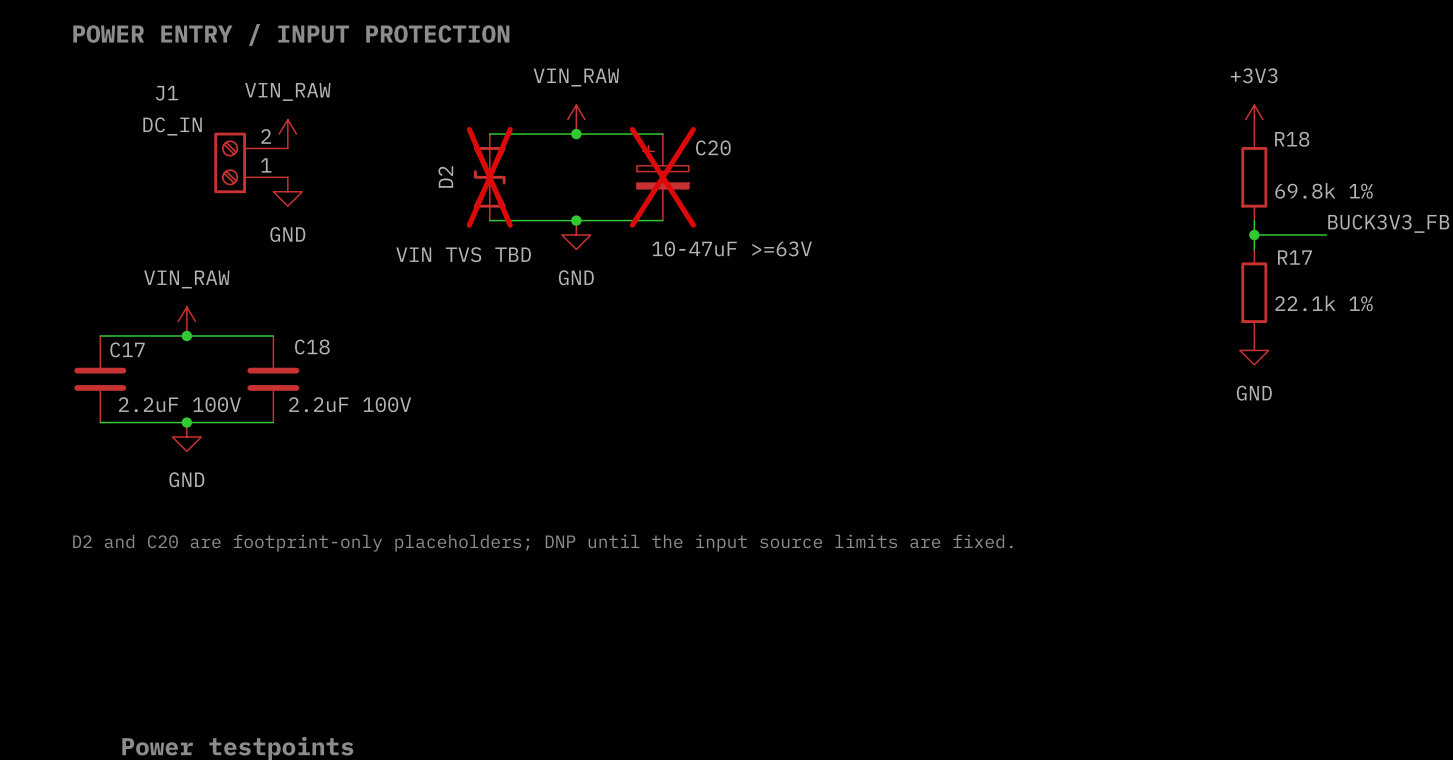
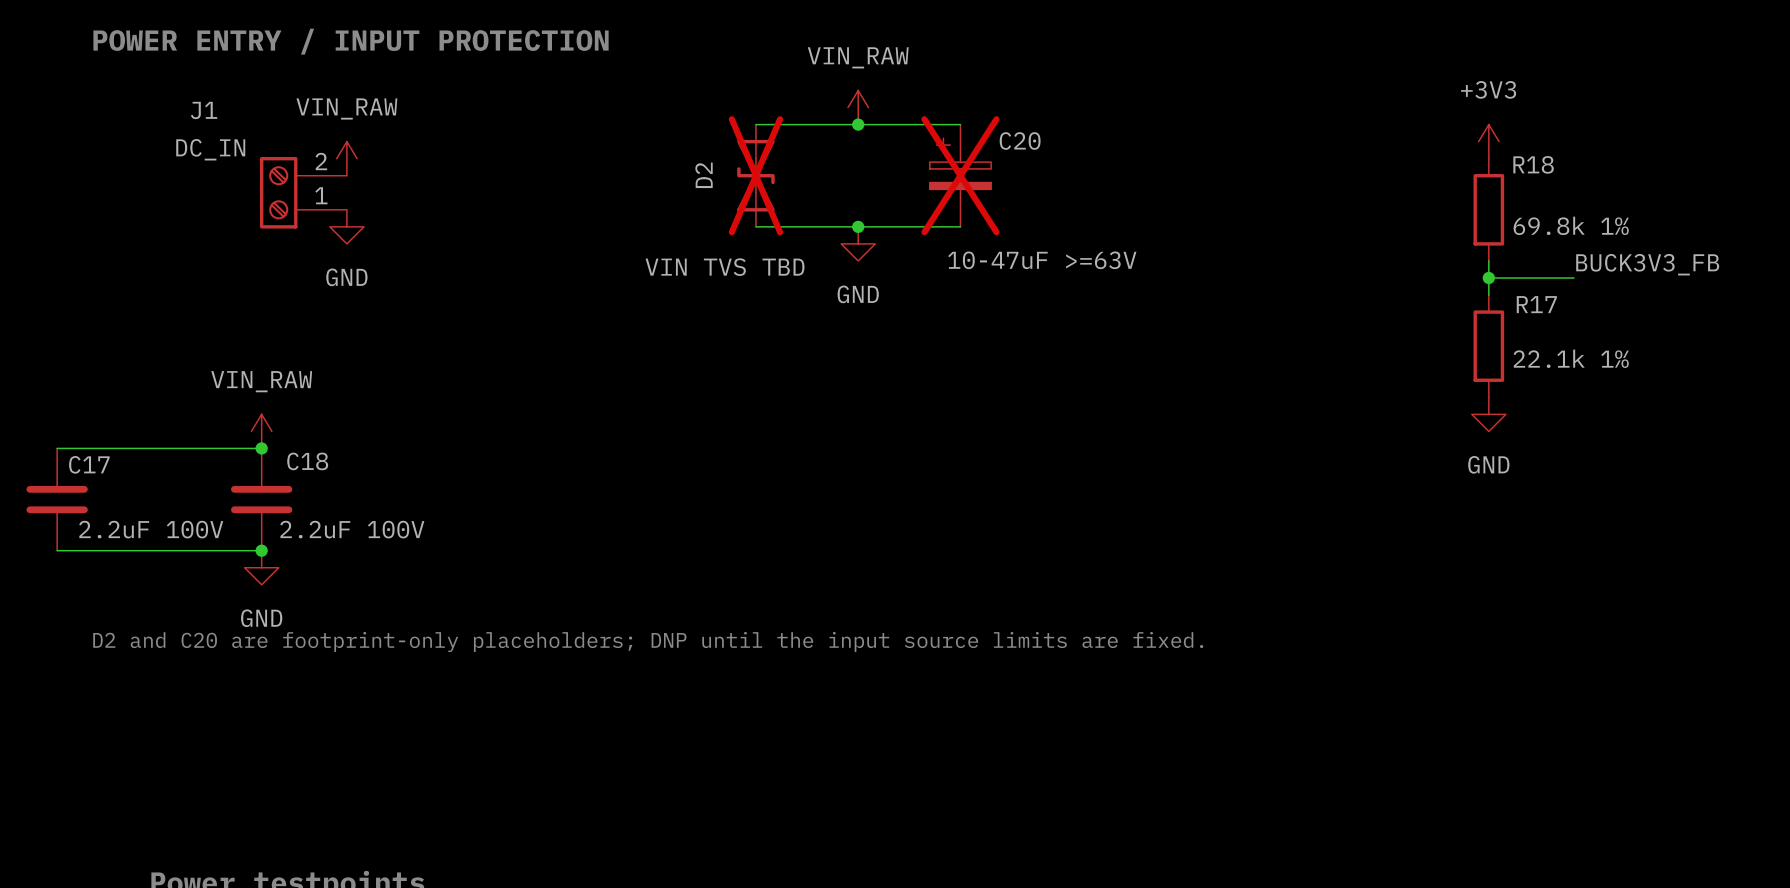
junction: none -> (858, 124)
power symbol position: VIN_RAW (576, 119) -> VIN_RAW (858, 107)
wire: (489, 134) (662, 134) -> (755, 124) (960, 124)
junction: (576, 134) -> none
D2 position: (489, 177) -> (755, 175)
C20 position: (662, 177) -> (960, 175)
junction: none -> (858, 226)
wire: (489, 220) (662, 220) -> (755, 226) (960, 226)
junction: (576, 220) -> none
power symbol position: GND (576, 235) -> GND (858, 243)
power symbol position: VIN_RAW (186, 321) -> VIN_RAW (261, 431)
wire: (100, 336) (273, 336) -> (57, 448) (261, 448)
junction: (186, 336) -> none
C17 position: (100, 379) -> (57, 499)
junction: none -> (261, 448)
C18 position: (273, 379) -> (261, 499)
wire: (100, 422) (273, 422) -> (57, 550) (261, 550)
junction: (186, 422) -> none
power symbol position: GND (186, 436) -> GND (261, 567)
junction: none -> (261, 550)

